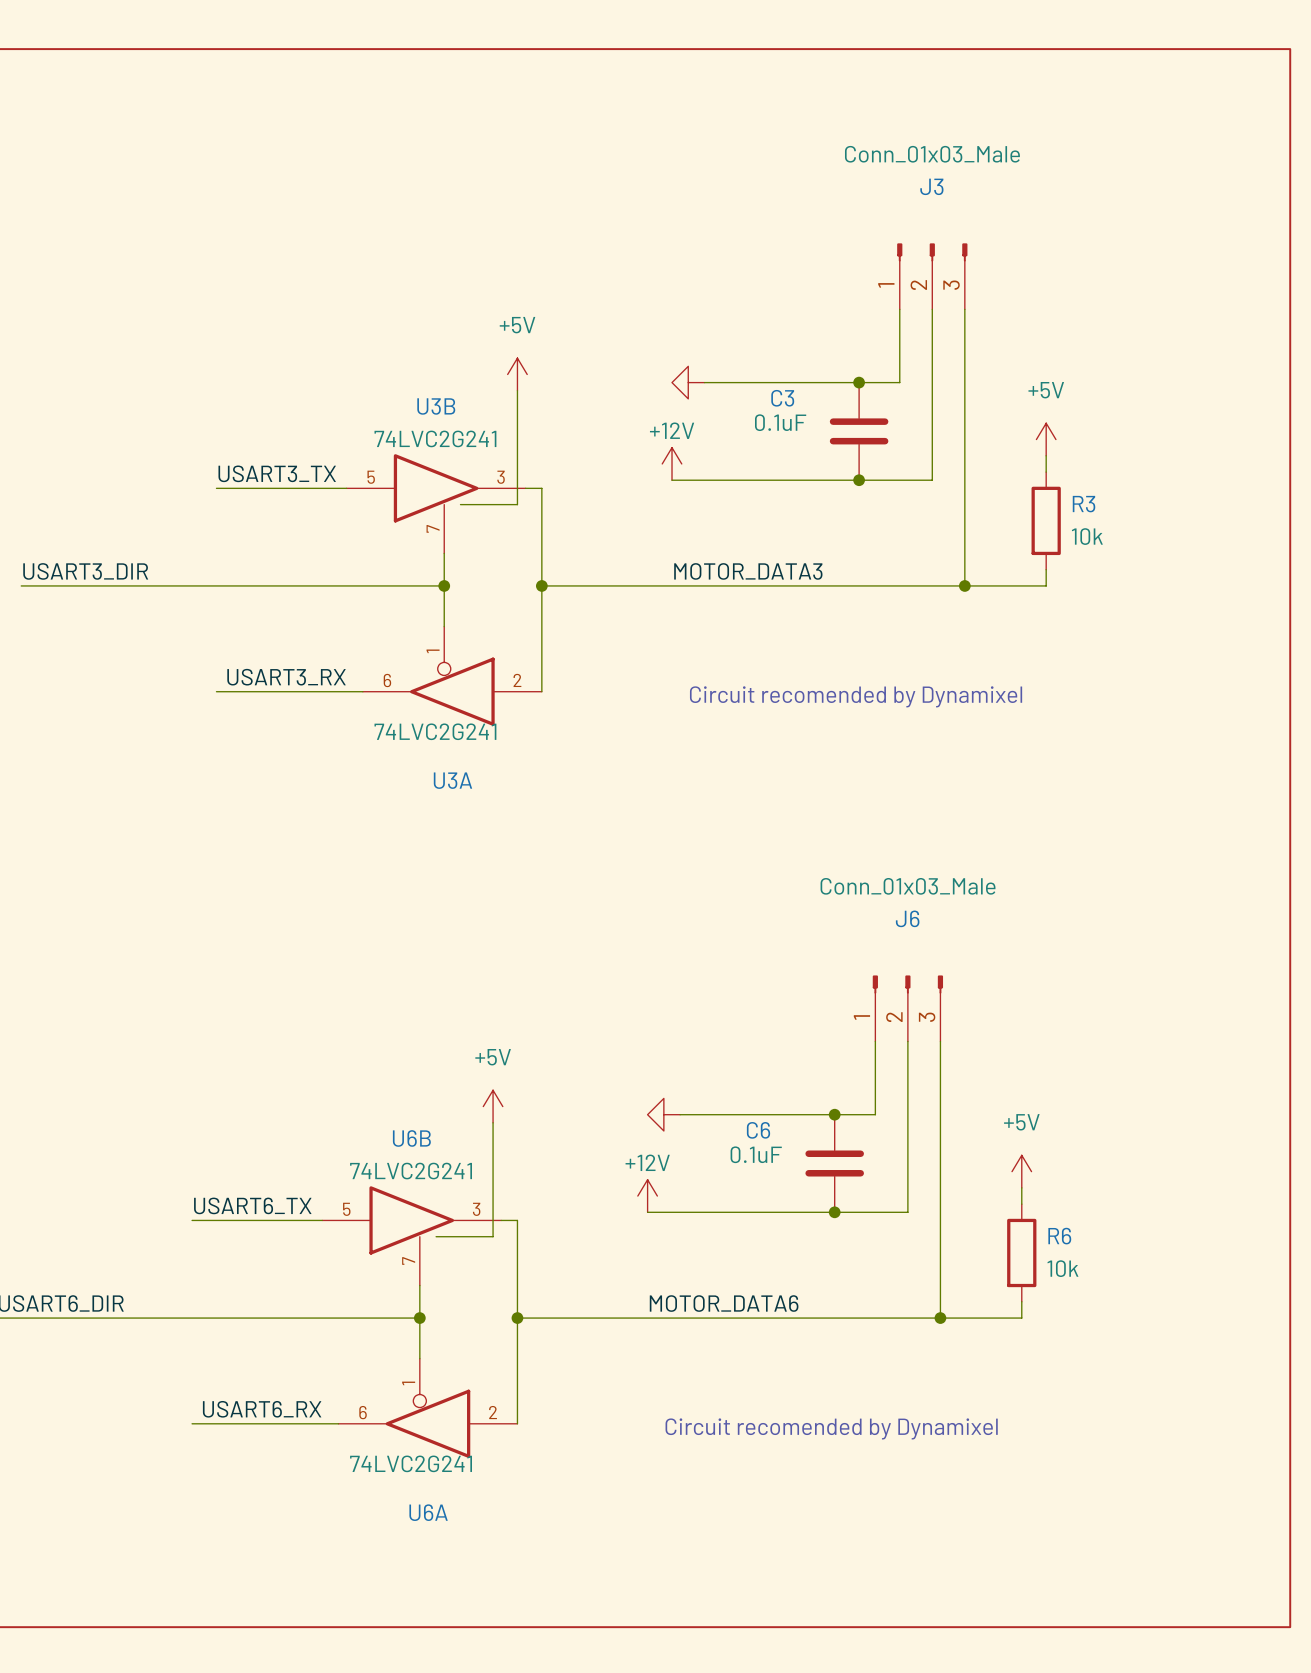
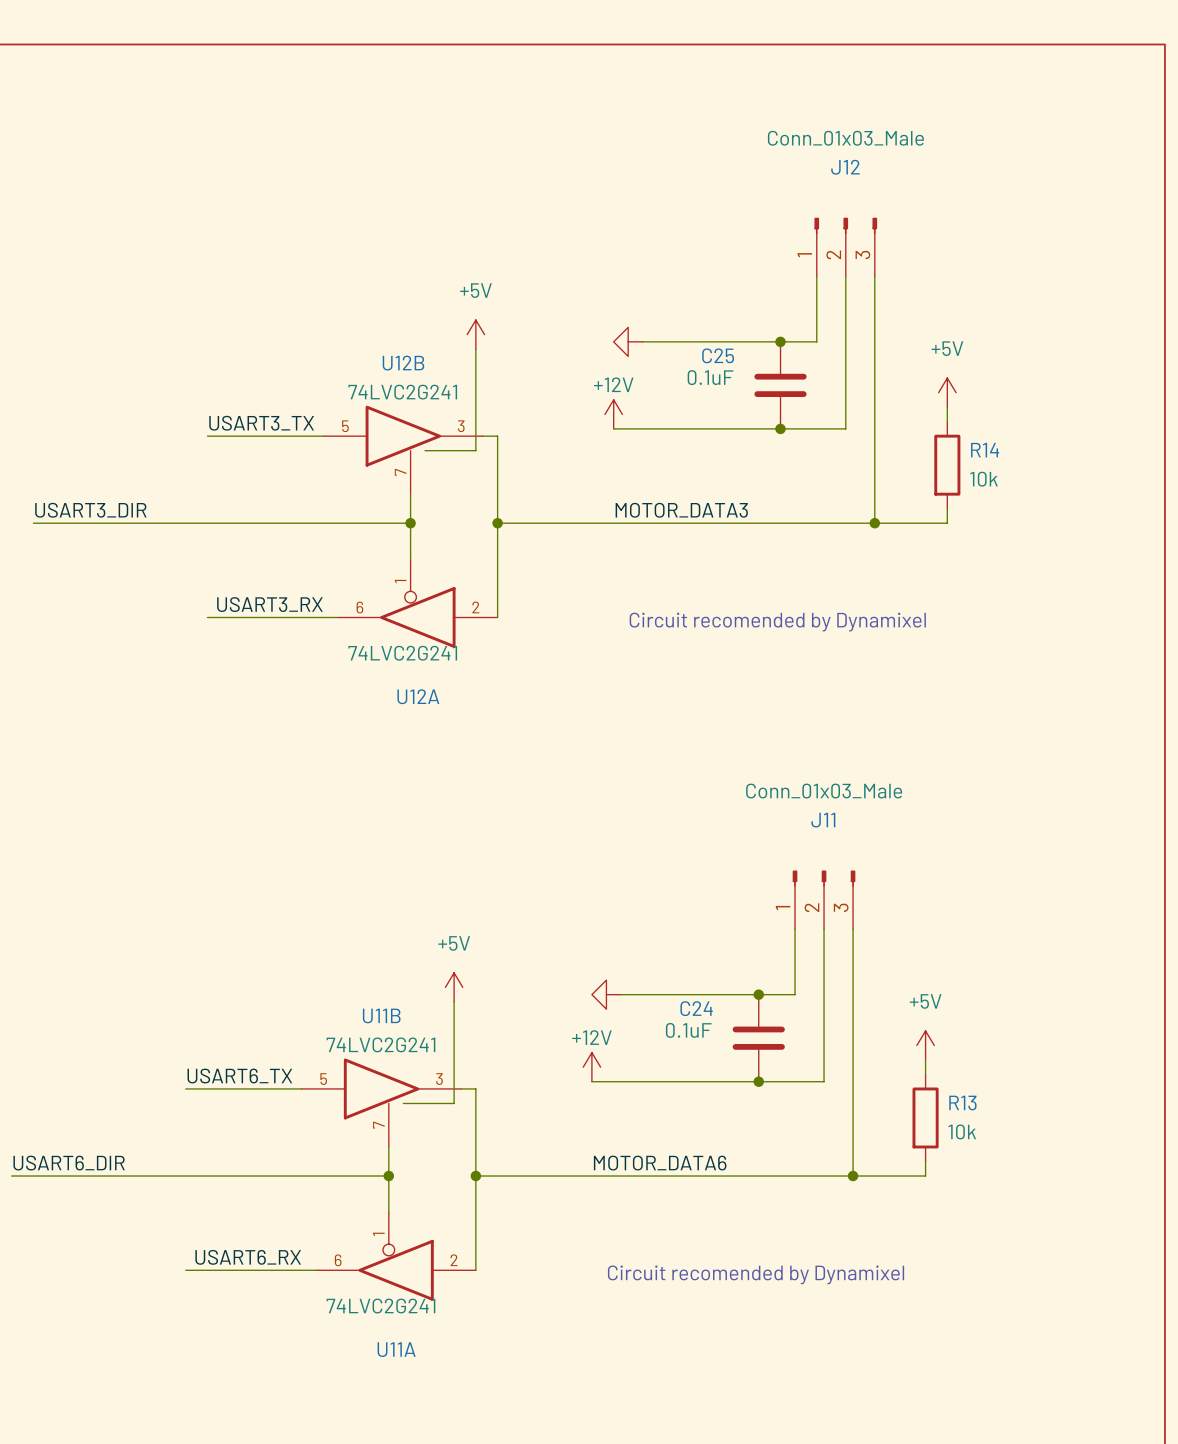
J3 name: J3 (931, 186) -> J12 (845, 167)
C3 name: C3 (782, 398) -> C25 (718, 355)
U3B name: U3B (436, 406) -> U12B (403, 363)
R3 name: R3 (1084, 504) -> R14 (985, 450)
U3A name: U3A (452, 780) -> U12A (418, 696)
J6 name: J6 (907, 918) -> J11 (823, 820)
C6 name: C6 (758, 1130) -> C24 (696, 1008)
U6B name: U6B (411, 1138) -> U11B (381, 1015)
R6 name: R6 (1059, 1236) -> R13 (962, 1103)
U6A name: U6A (428, 1512) -> U11A (396, 1349)

